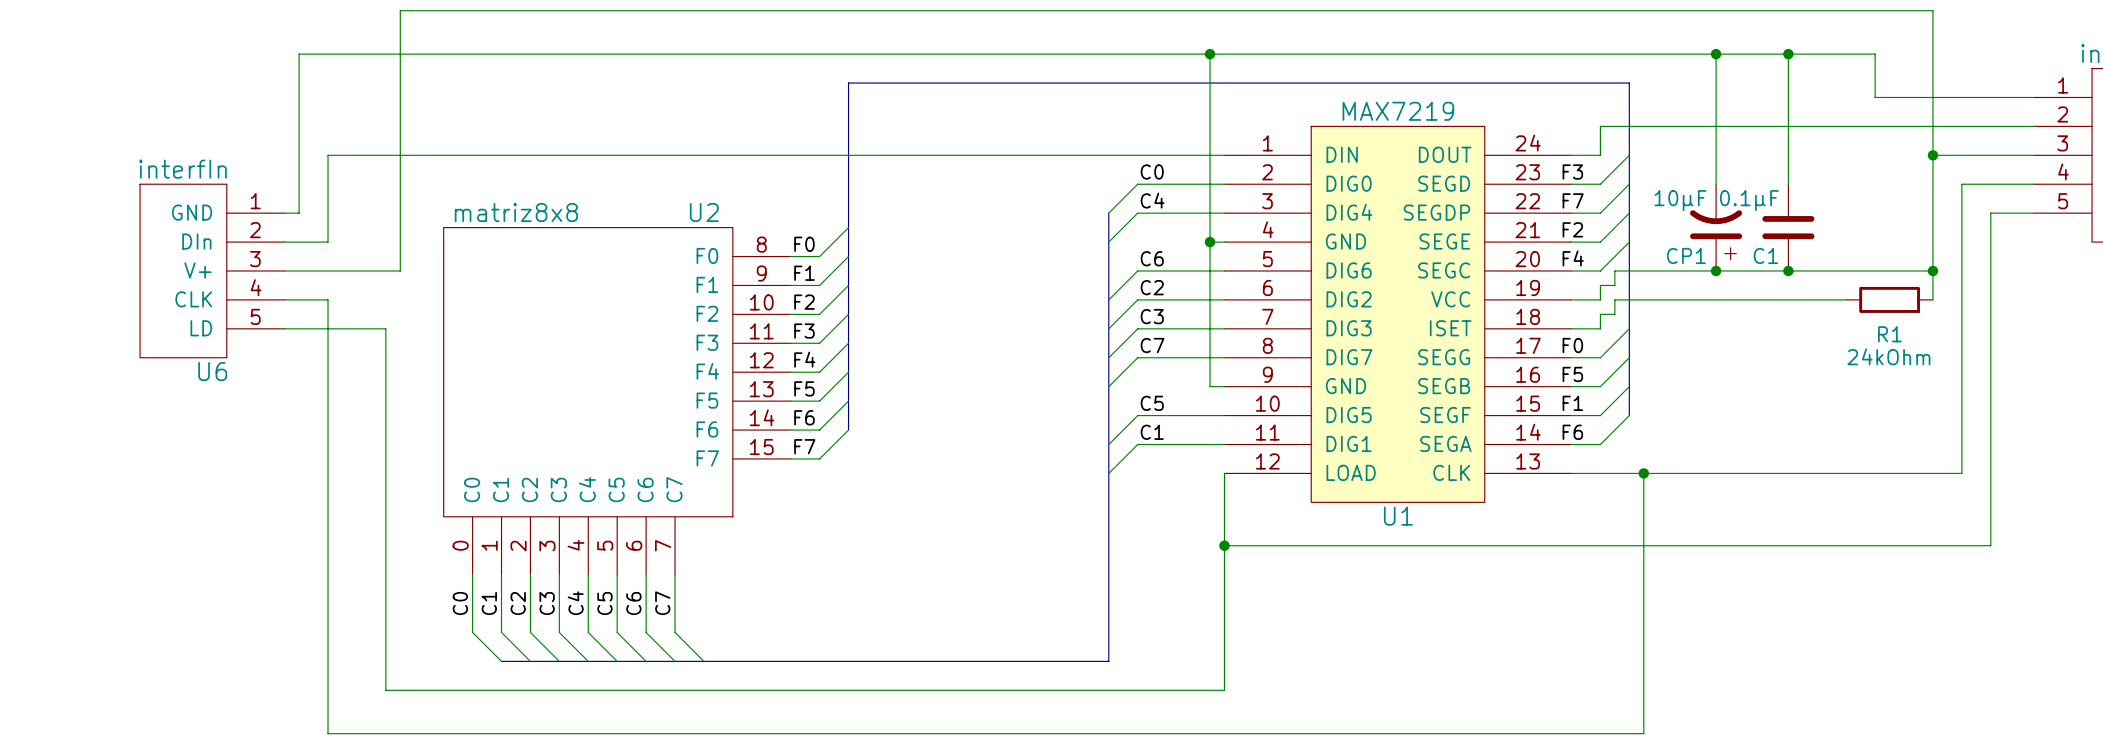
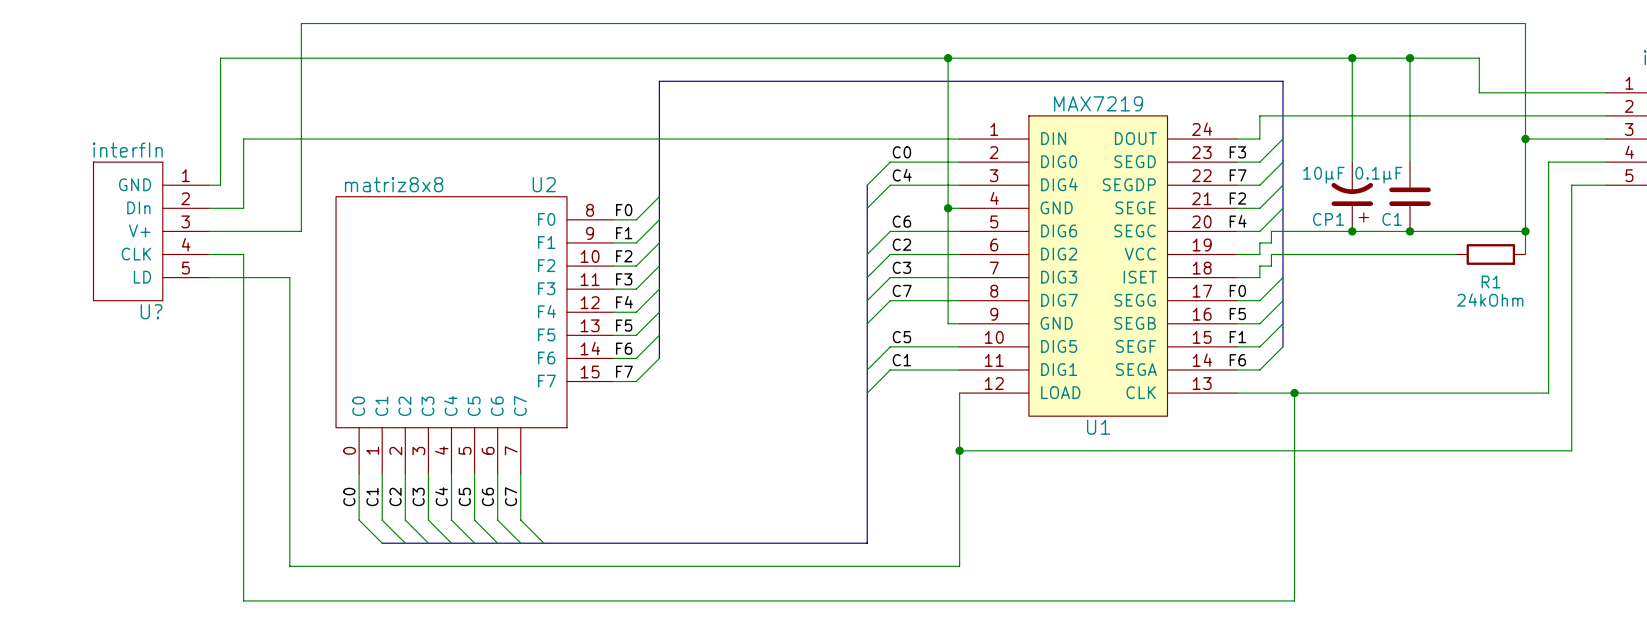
U6 name: U6 (212, 371) -> U? (151, 311)

